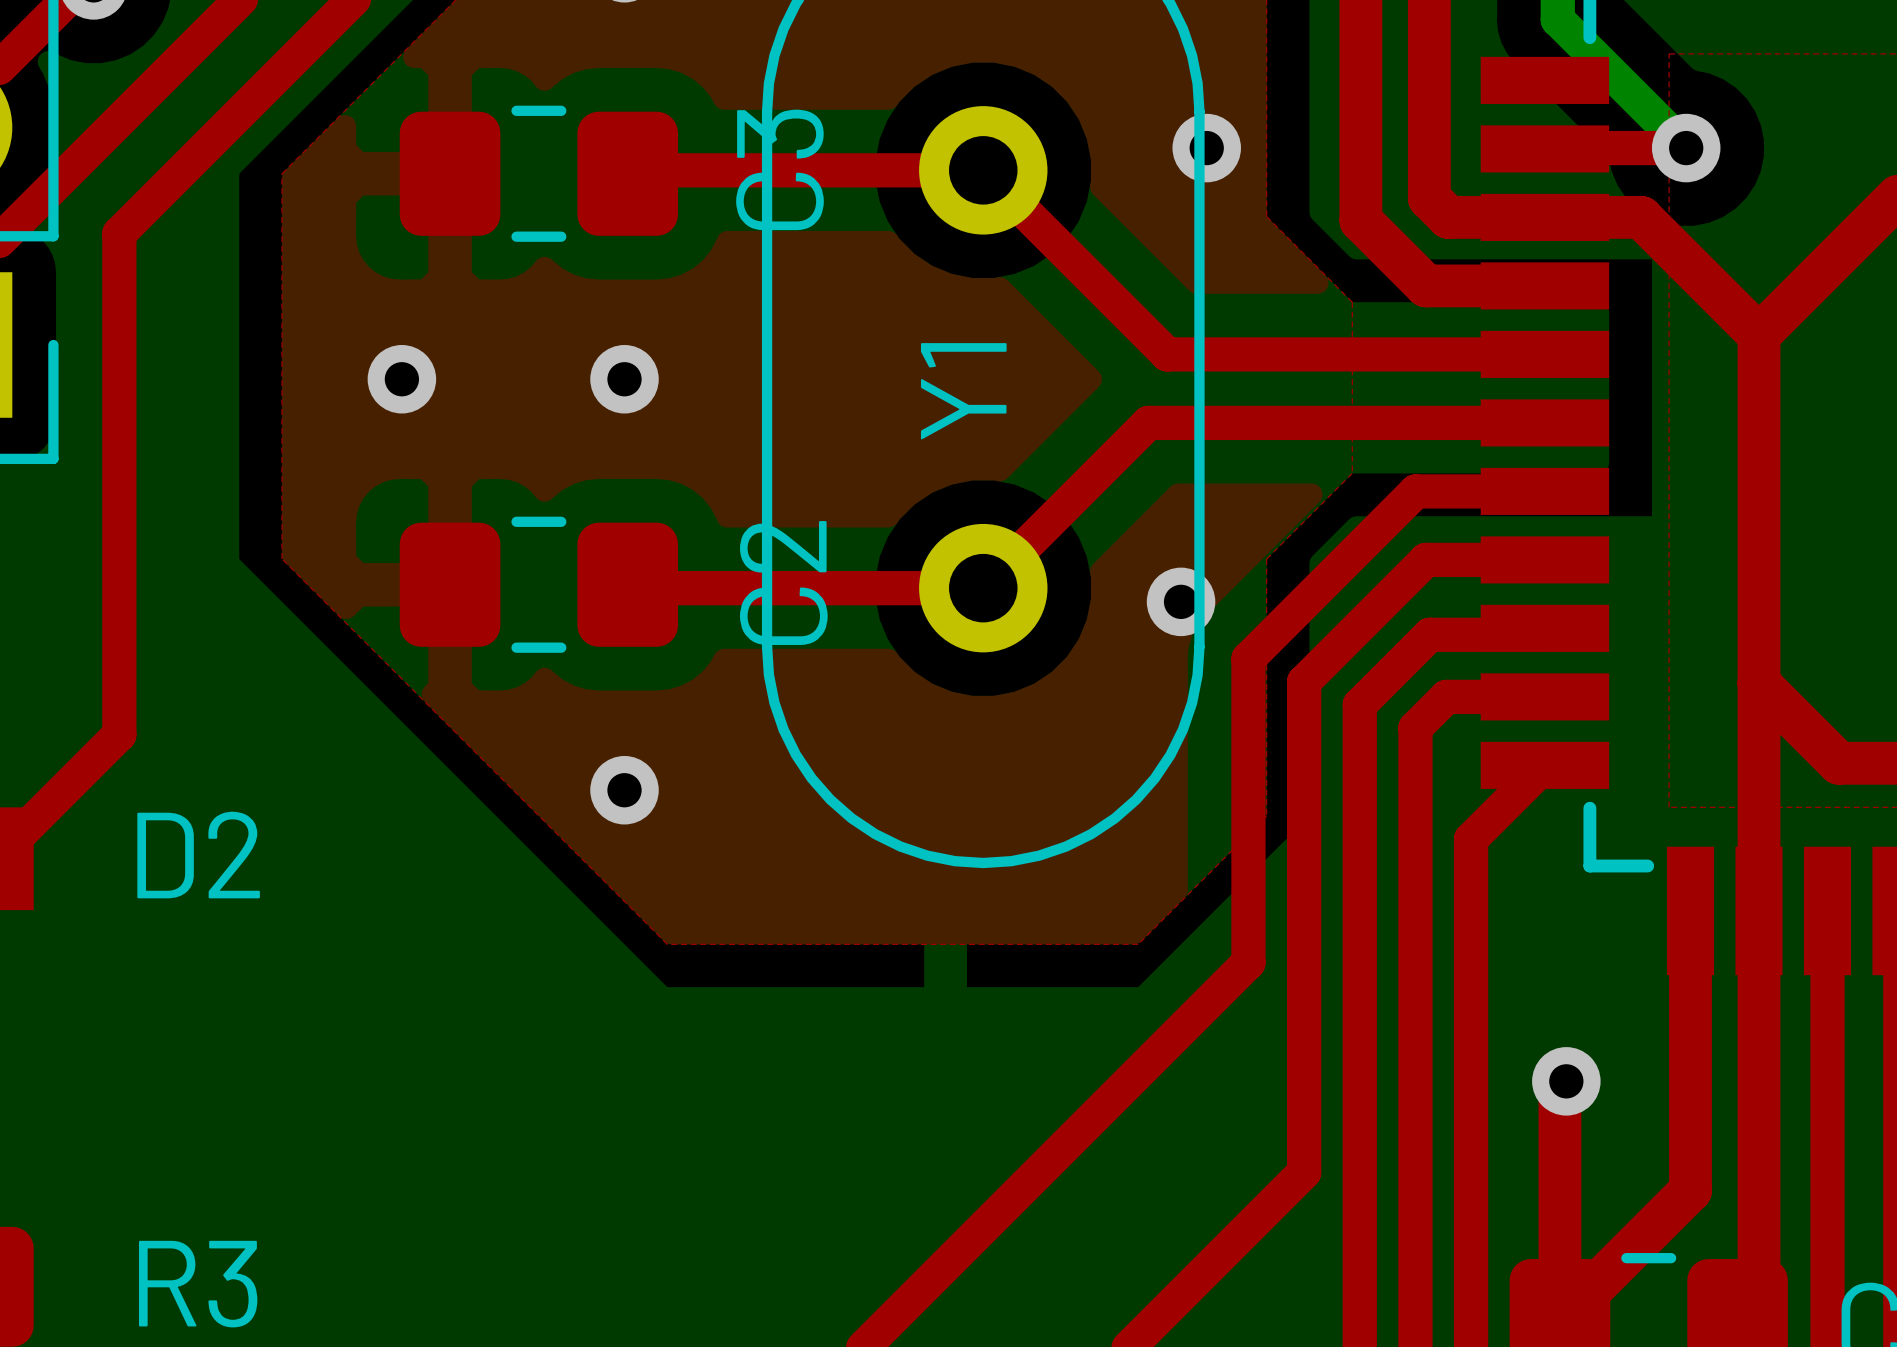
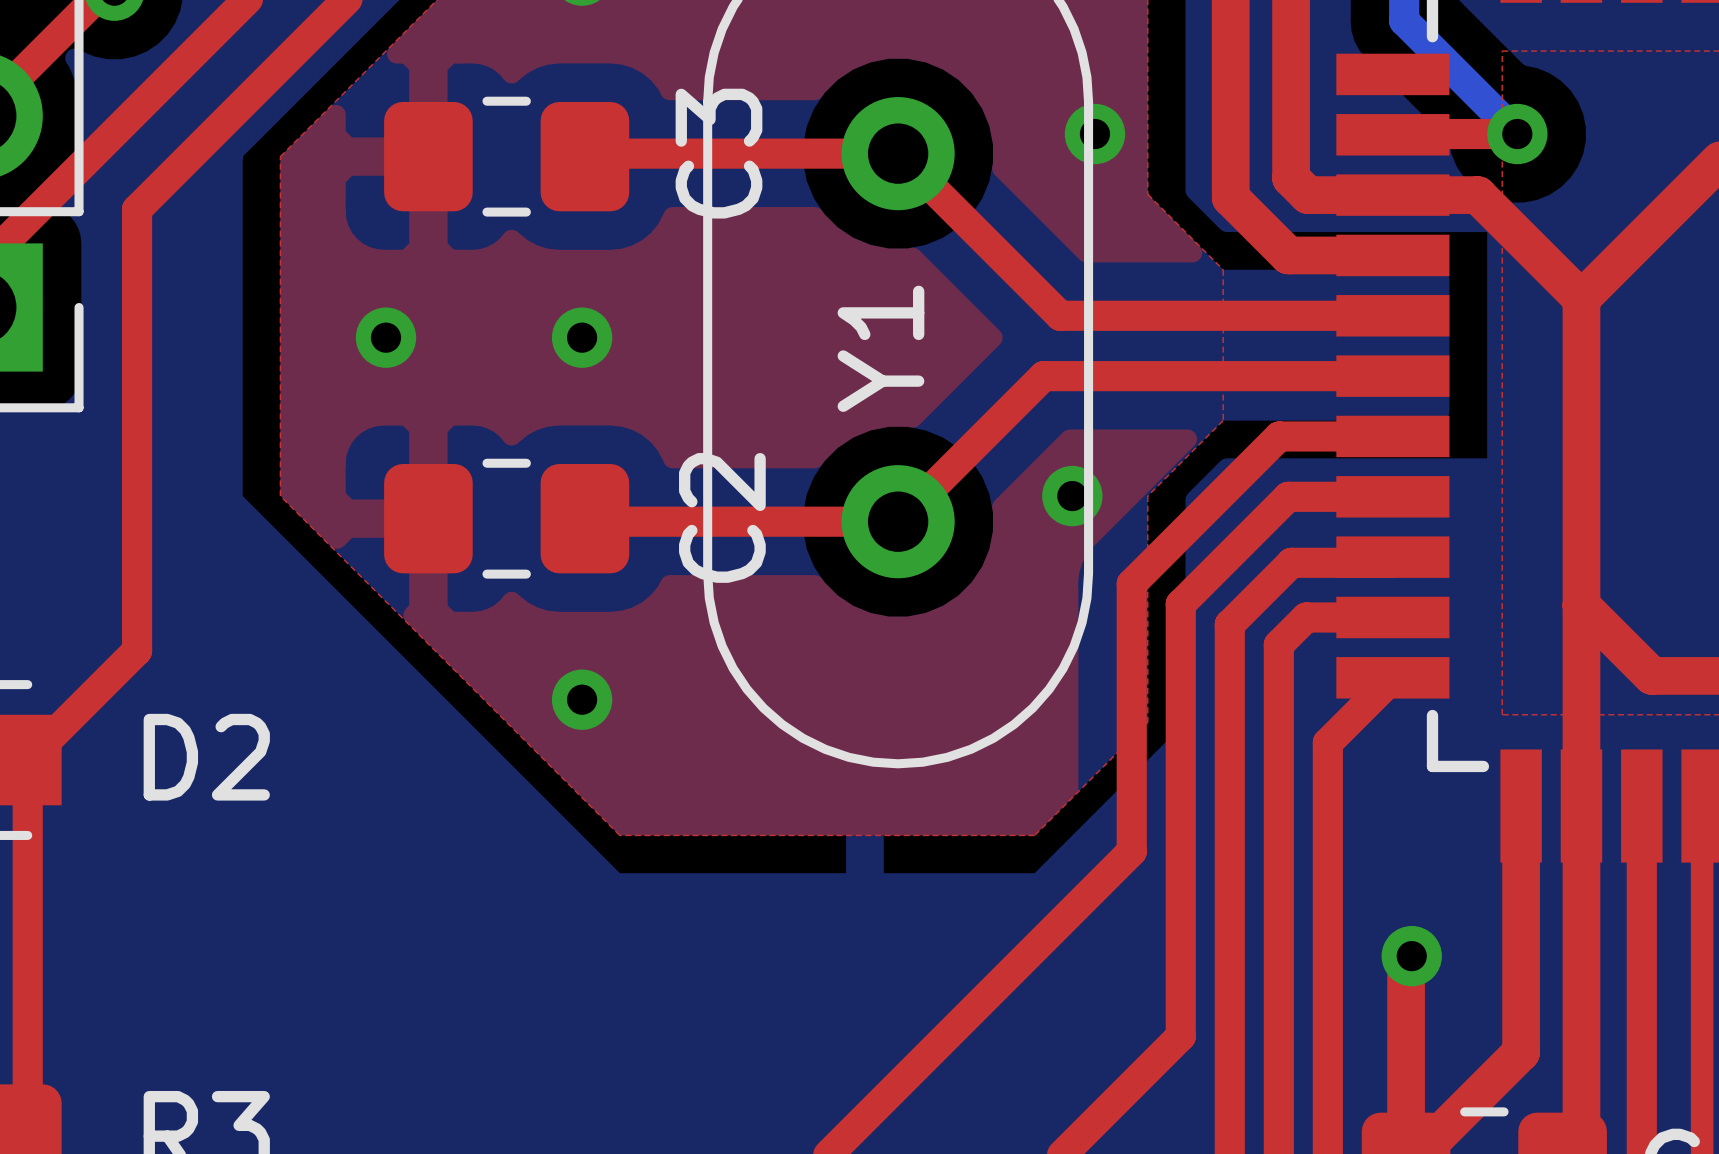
via position: (1181, 601) -> (1072, 496)

